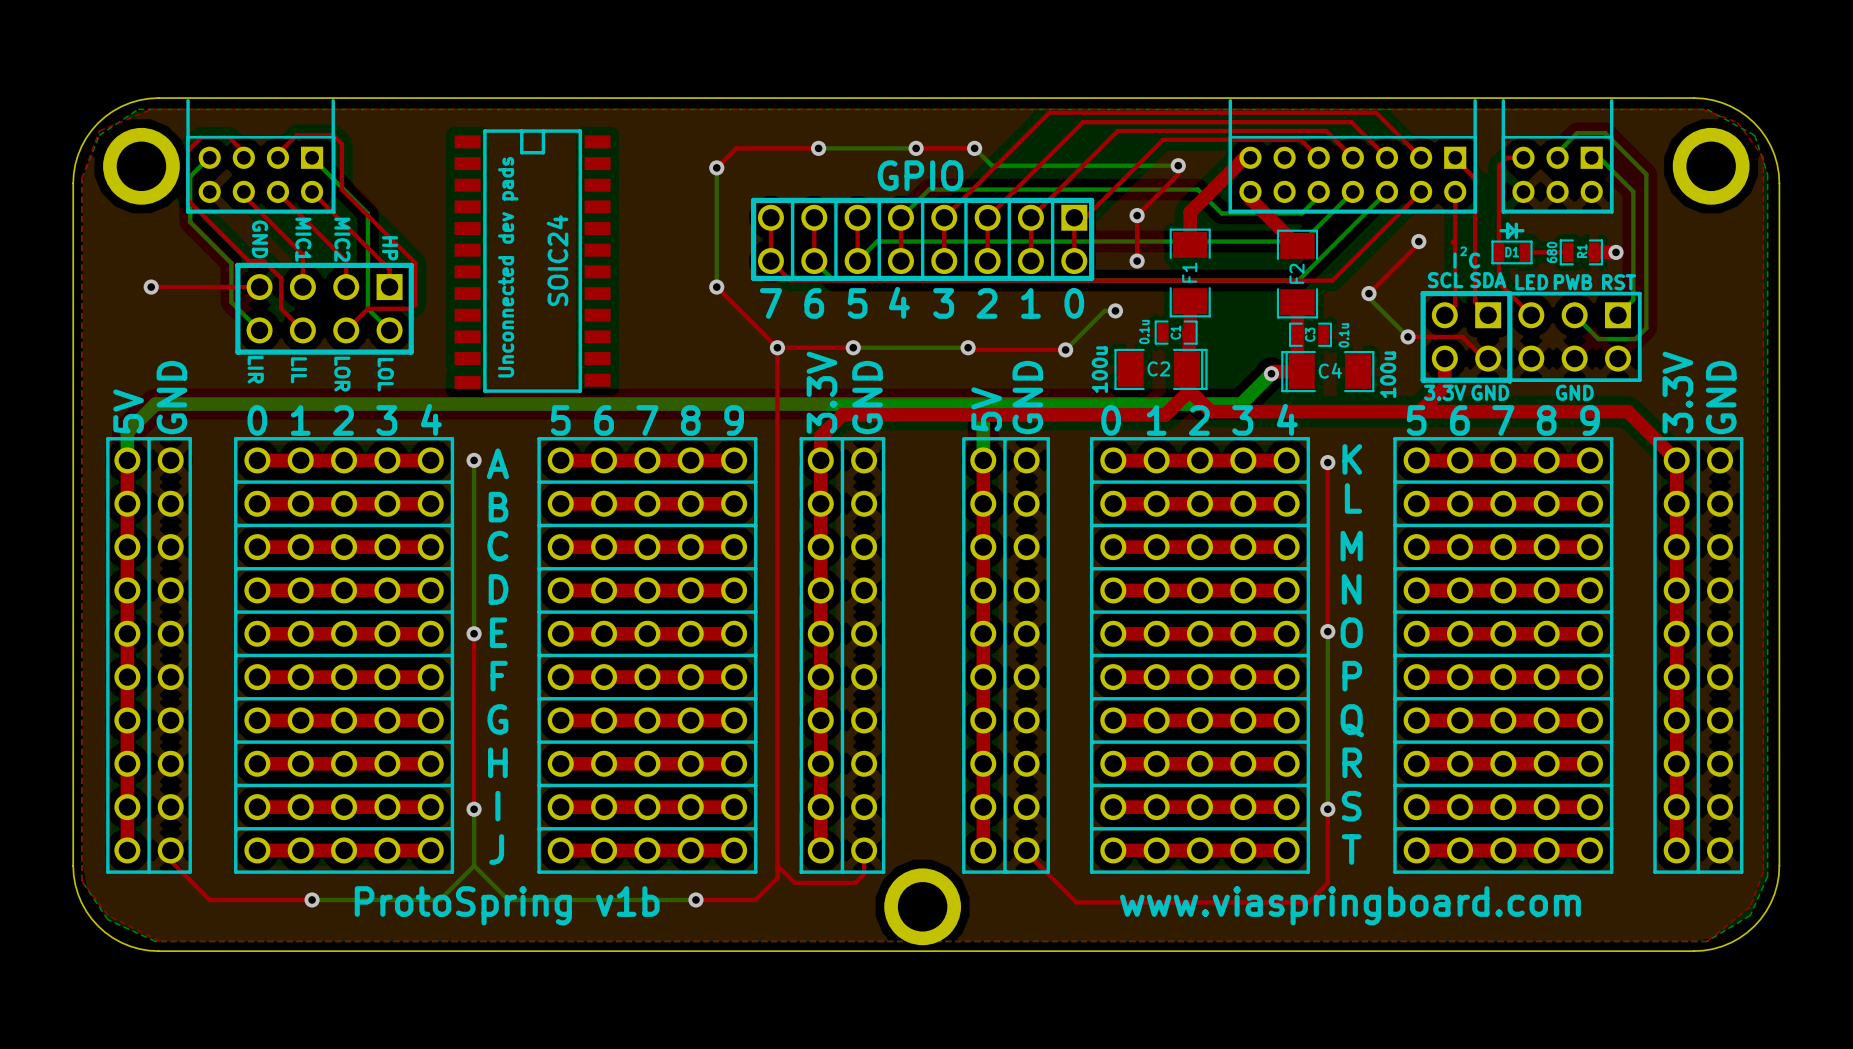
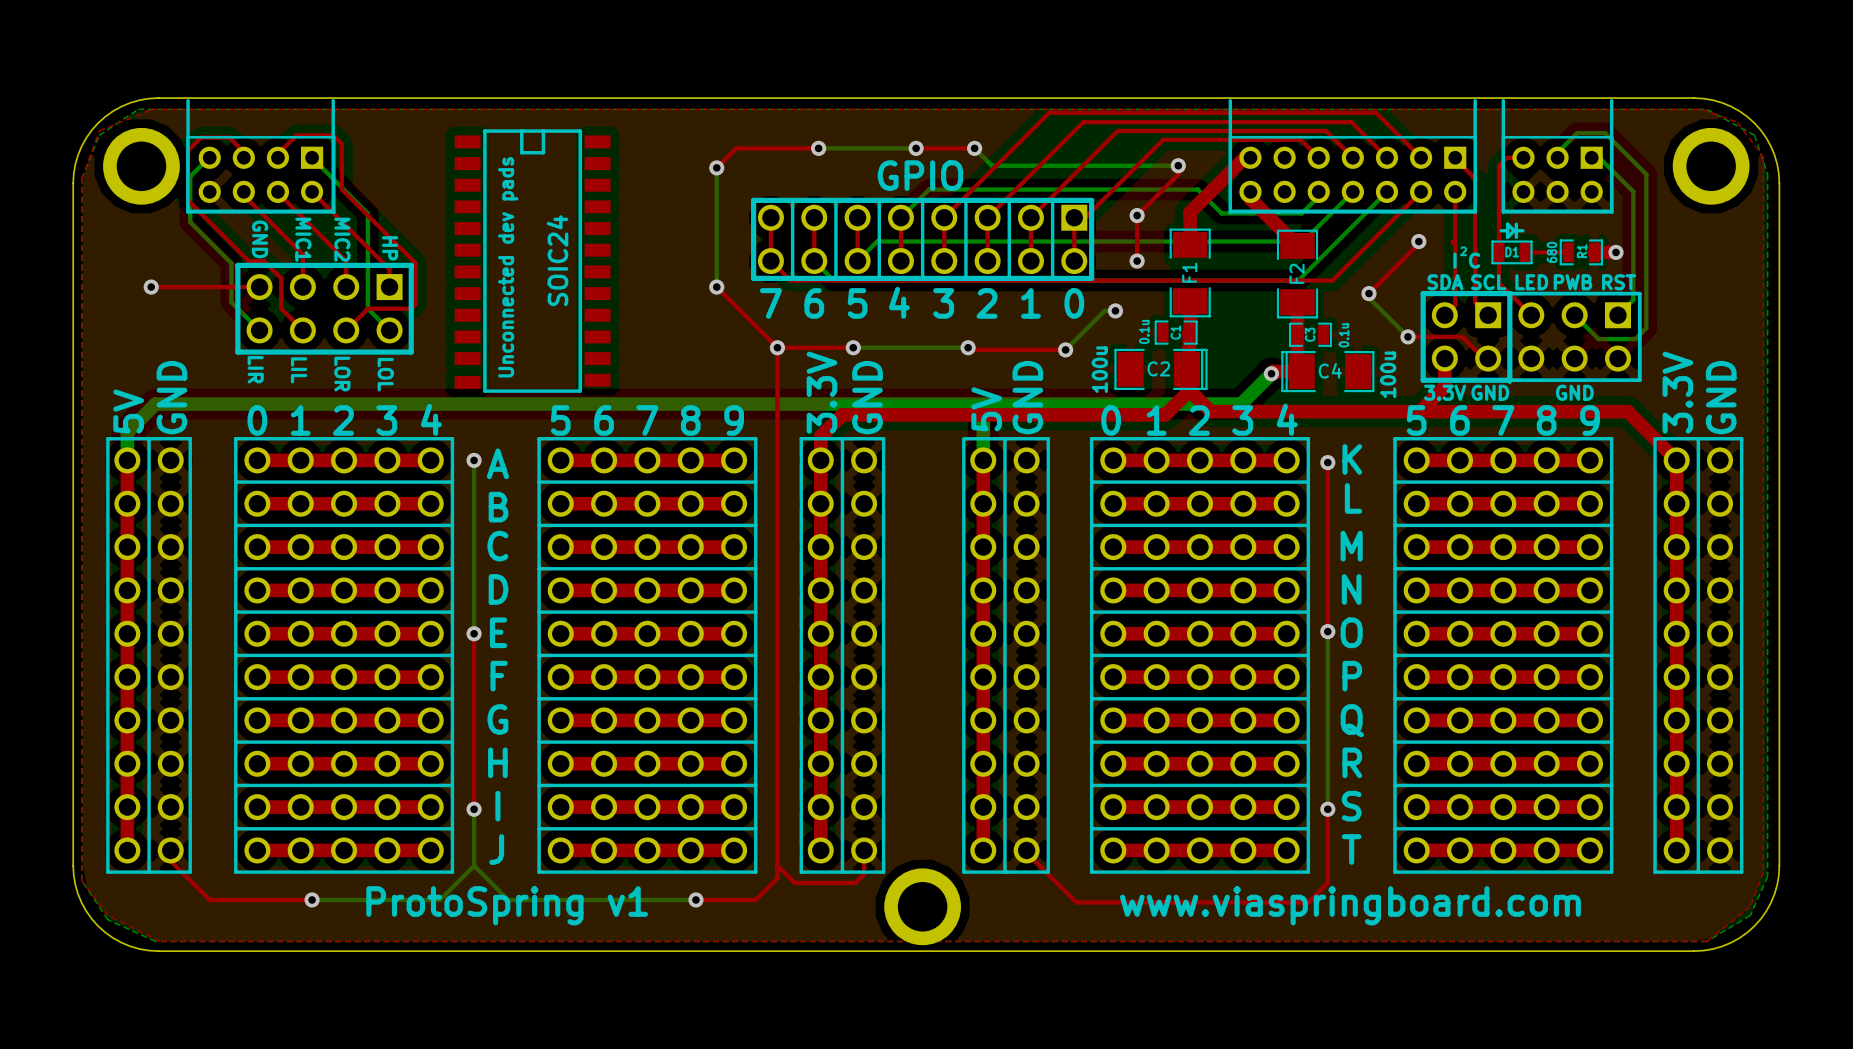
text: SCL (1445, 280) -> SDA (1445, 282)
text: SDA (1488, 280) -> SCL (1488, 282)
text: ProtoSpring v1b (507, 905) -> ProtoSpring v1 (507, 905)

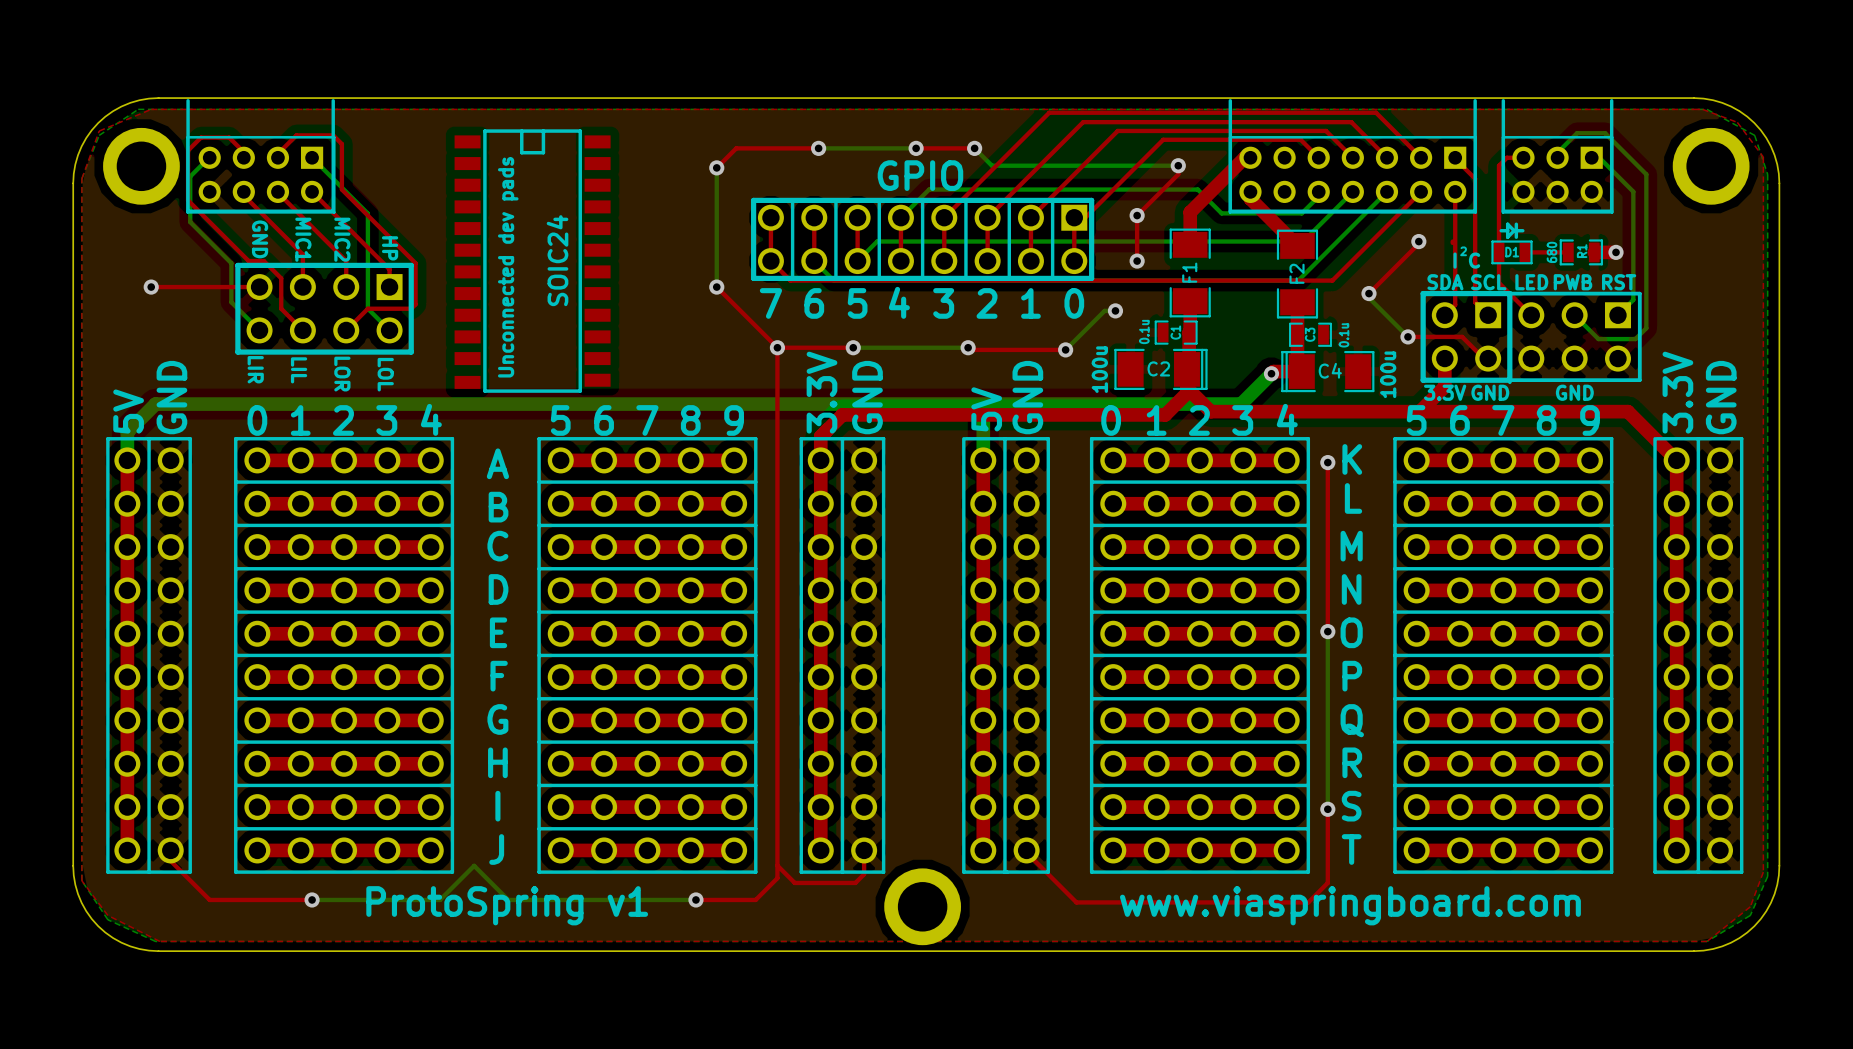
bottom track: (474, 460) (474, 633) -> none
via: (474, 460) -> none
top track: (474, 633) (474, 809) -> none
via: (474, 633) -> none
bottom track: (474, 809) (474, 865) -> none
via: (474, 809) -> none

